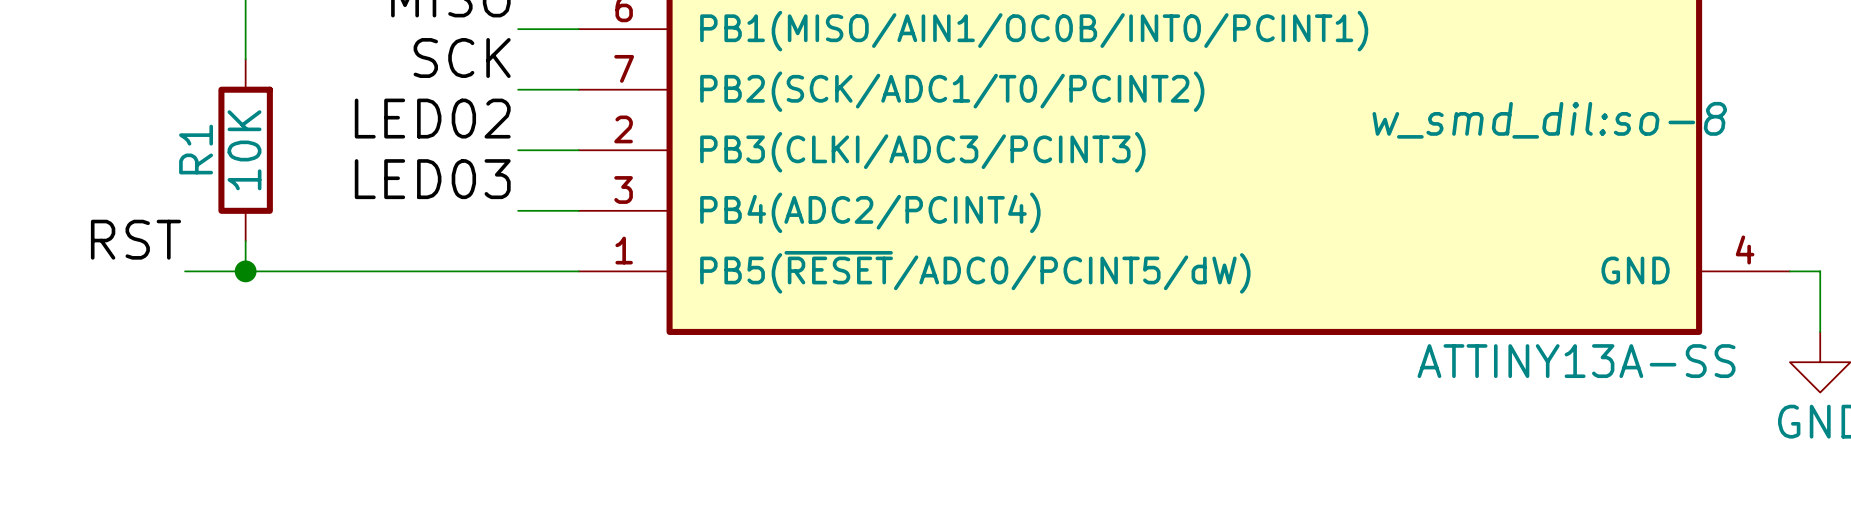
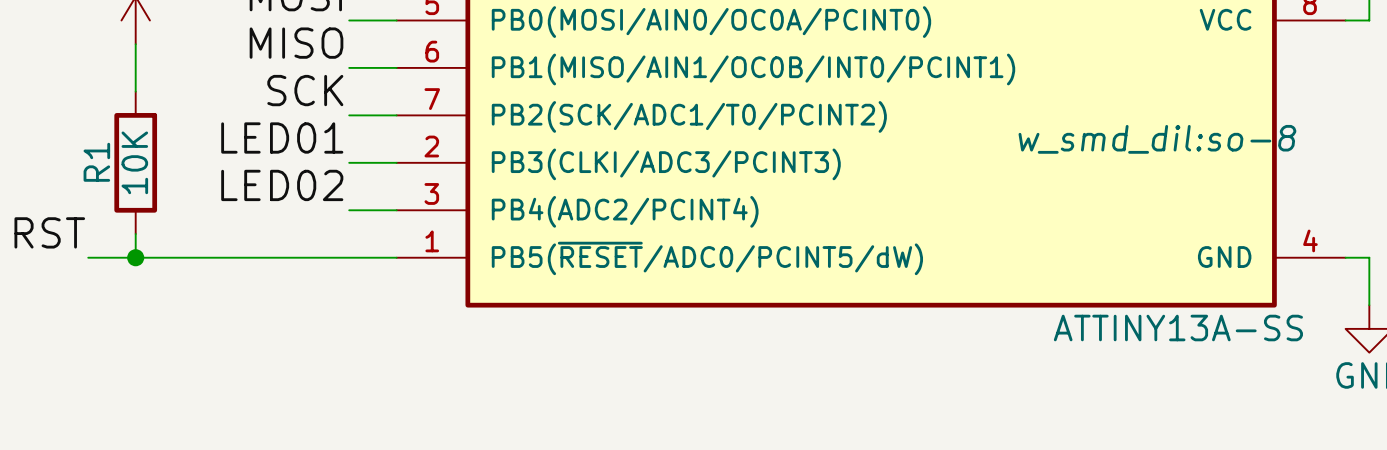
label: LED02 (432, 118) -> LED01 (282, 138)
label: LED03 (432, 179) -> LED02 (282, 185)

